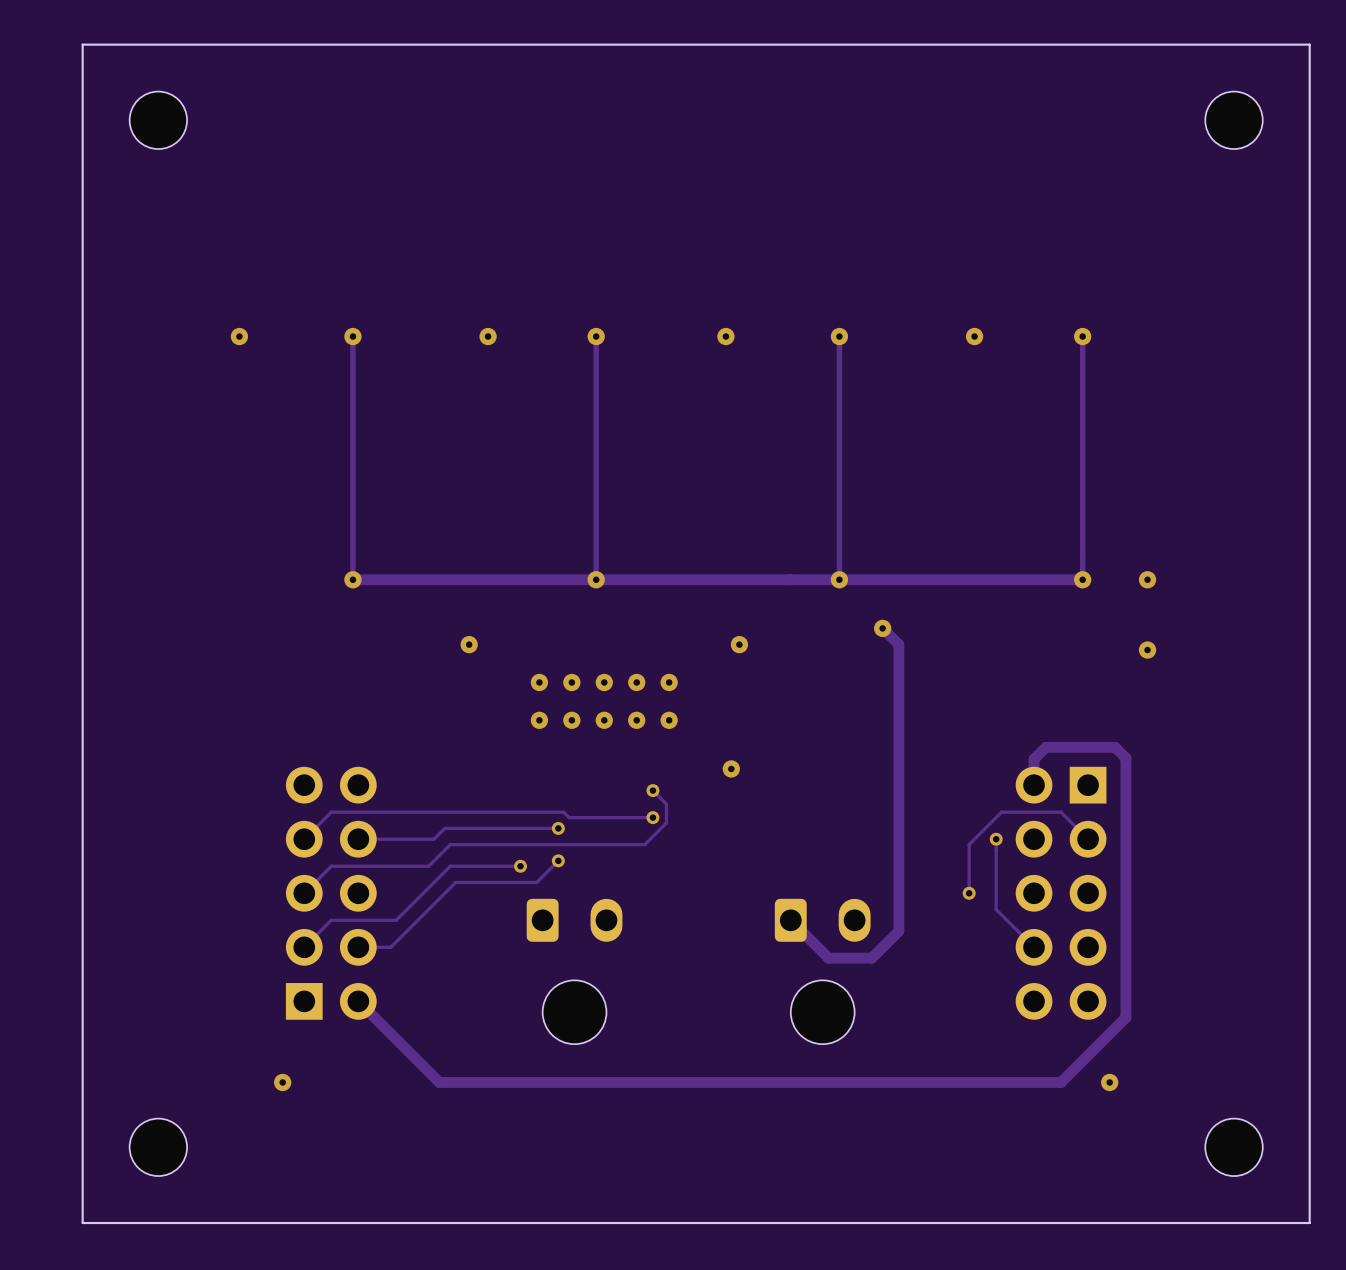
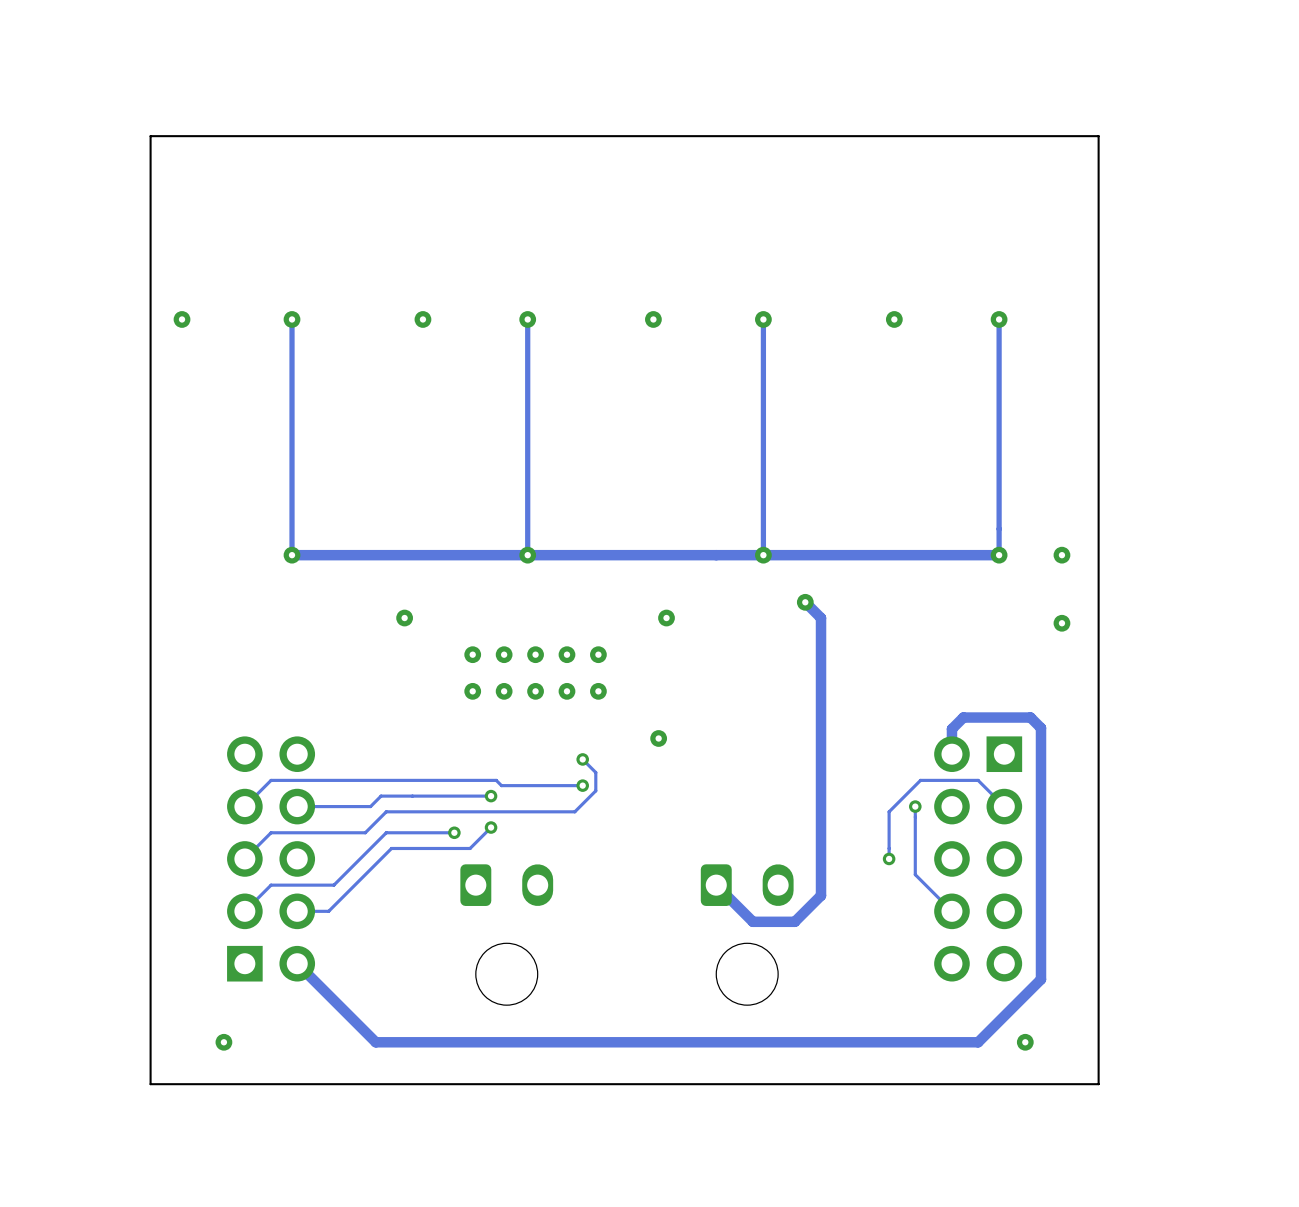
board edge: (1309, 44) (82, 44) (82, 1223) (1309, 1223) (1309, 44) -> (1098, 136) (1098, 1084) (150, 1084) (150, 136) (1098, 136)
part: (158, 120) -> none
part: (1234, 120) -> none
part: (158, 1147) -> none
part: (1234, 1147) -> none

